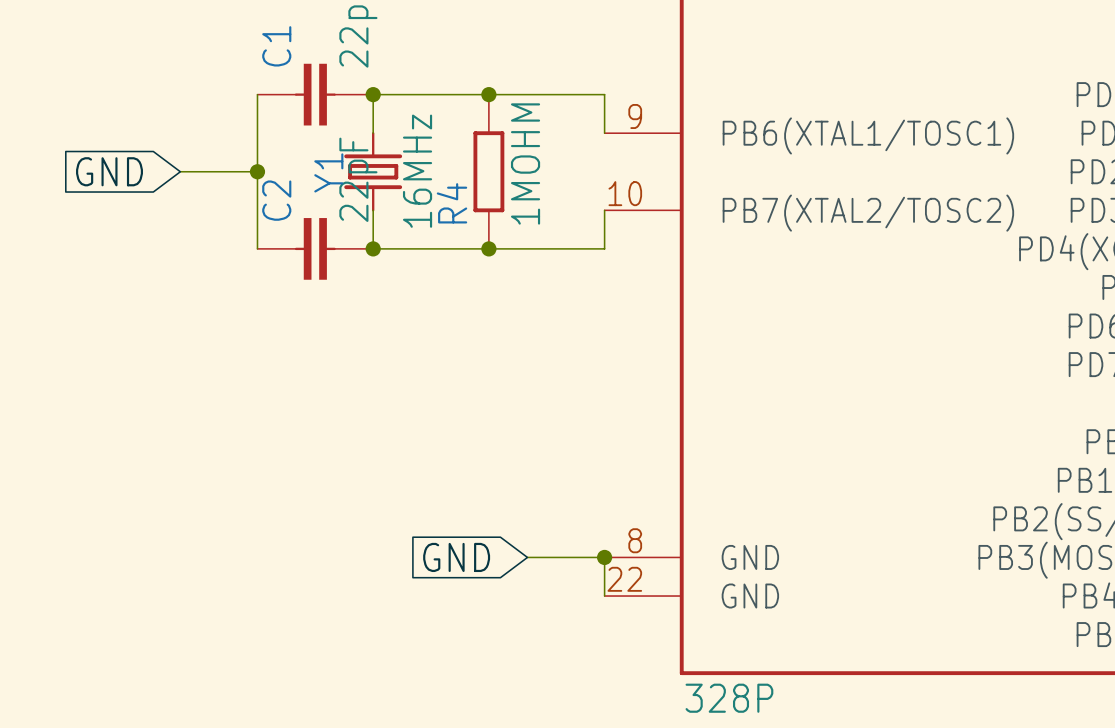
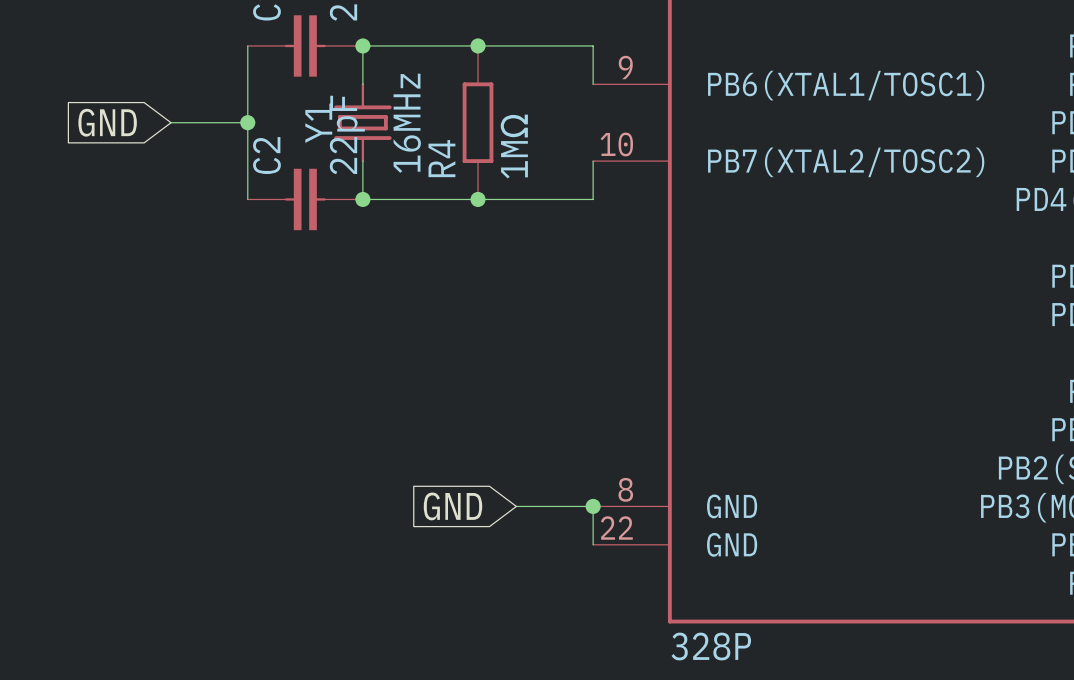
R4 value: 1MOHM (525, 163) -> 1MΩ (514, 146)

